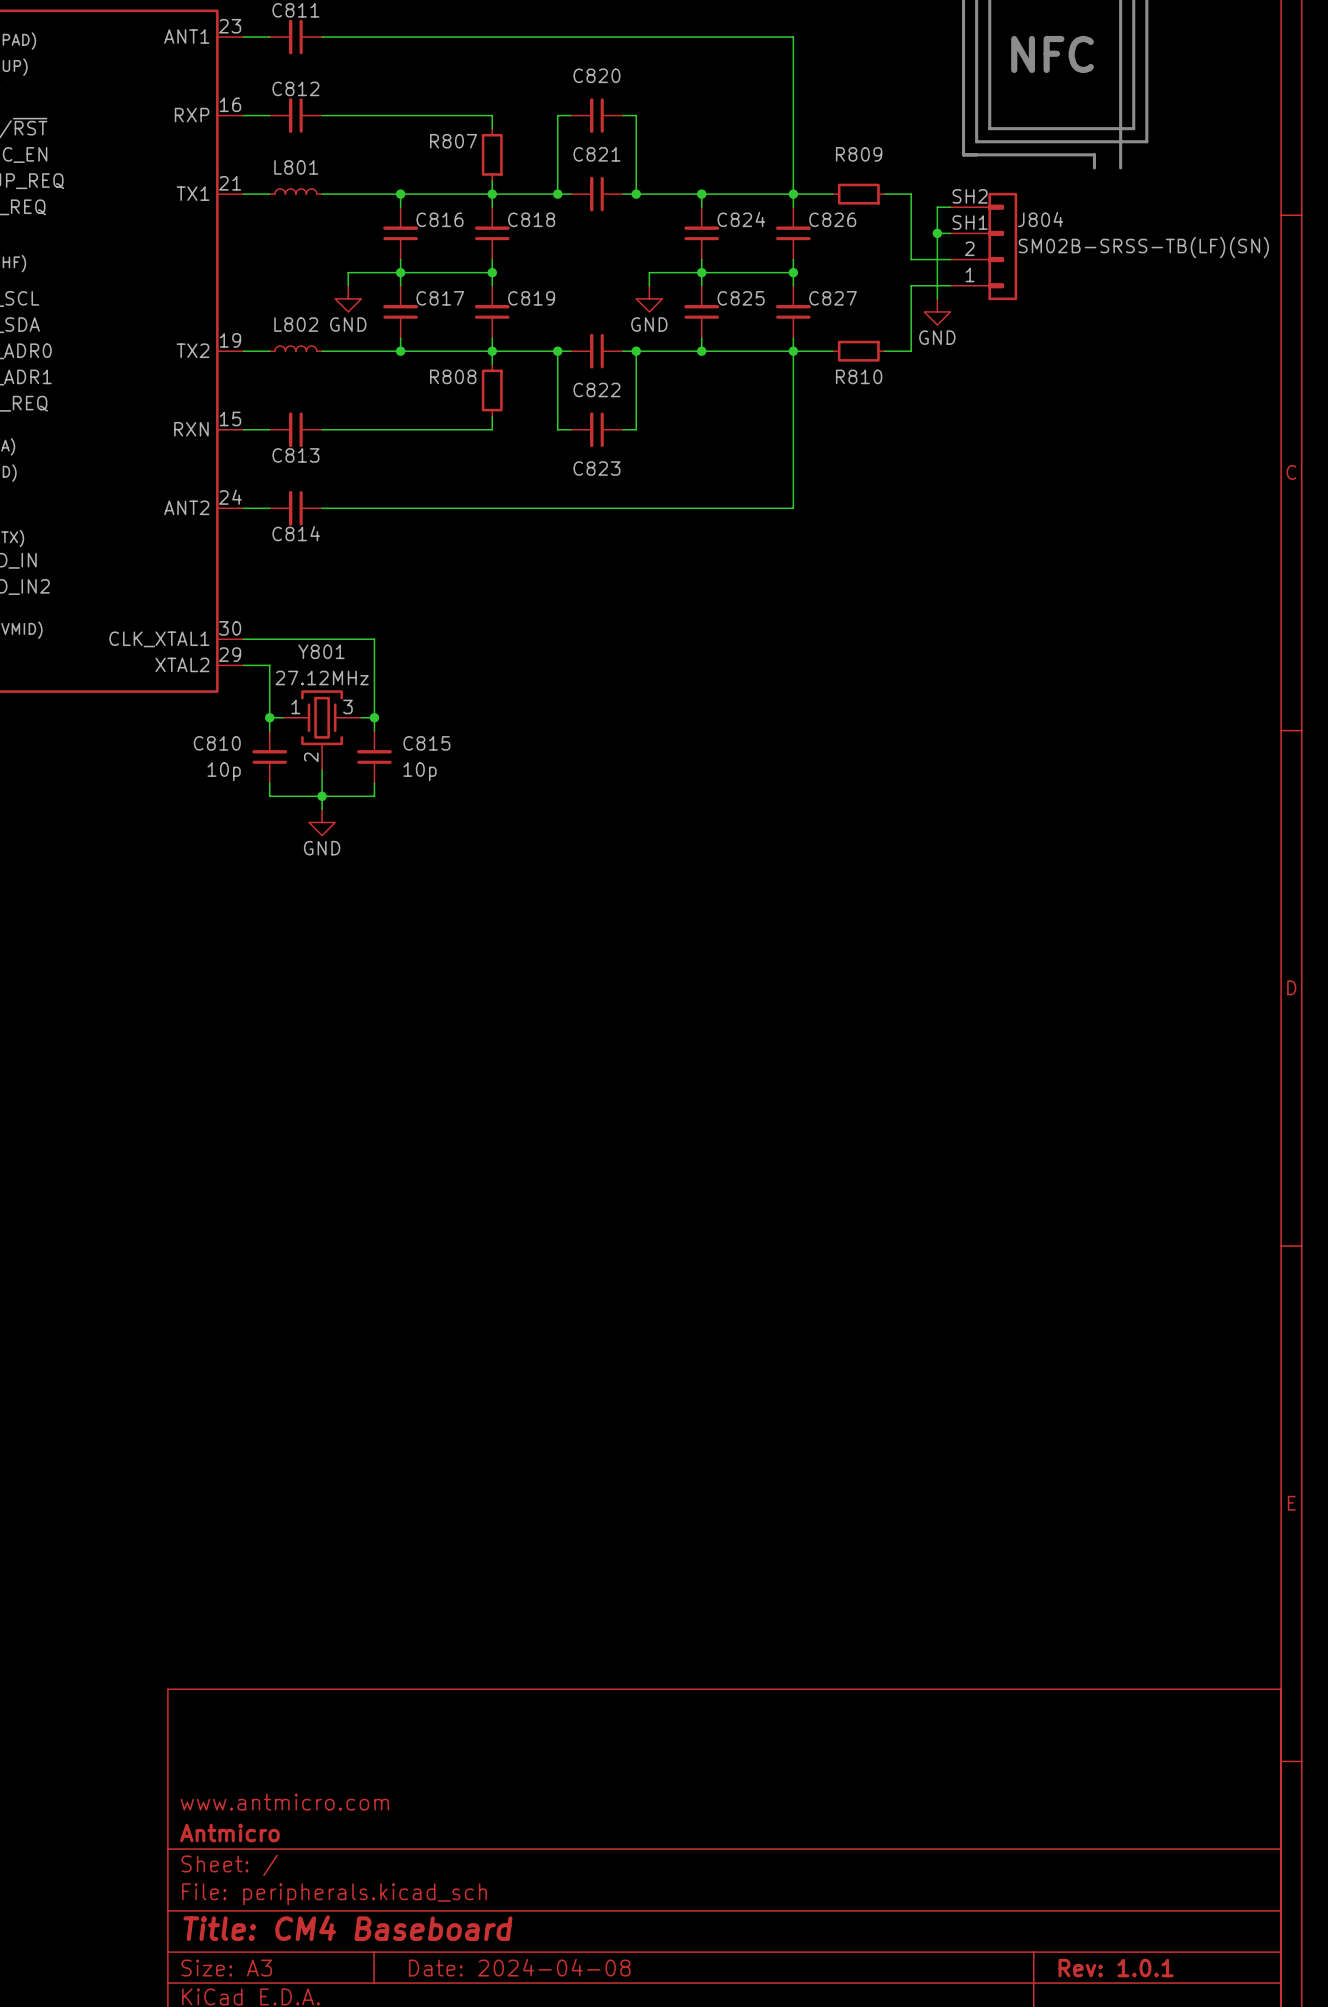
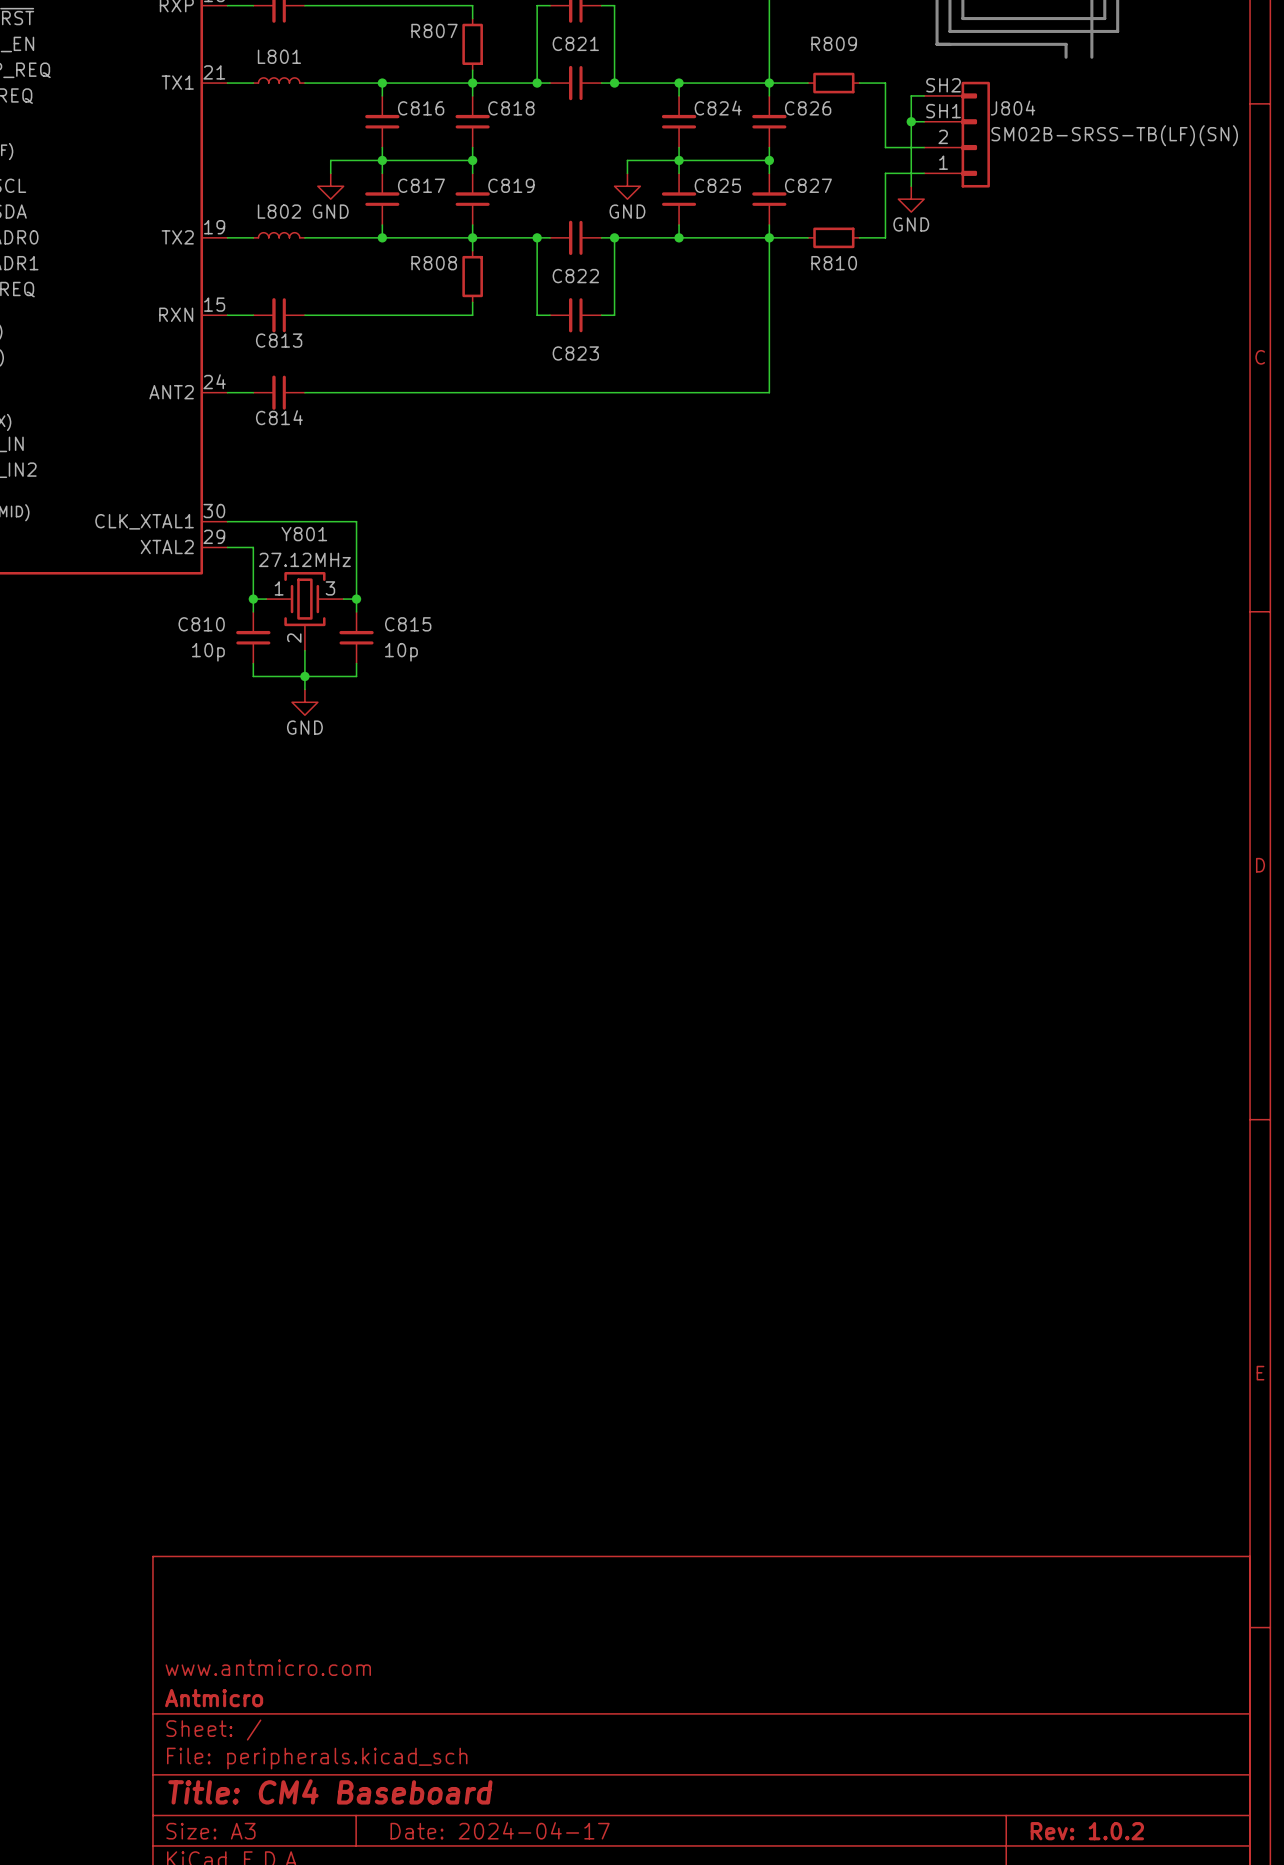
title block: Date: 2024-04-08 (519, 1967) -> Date: 2024-04-17 (500, 1830)
title block: Rev: 1.0.1 (1116, 1968) -> Rev: 1.0.2 (1087, 1831)

